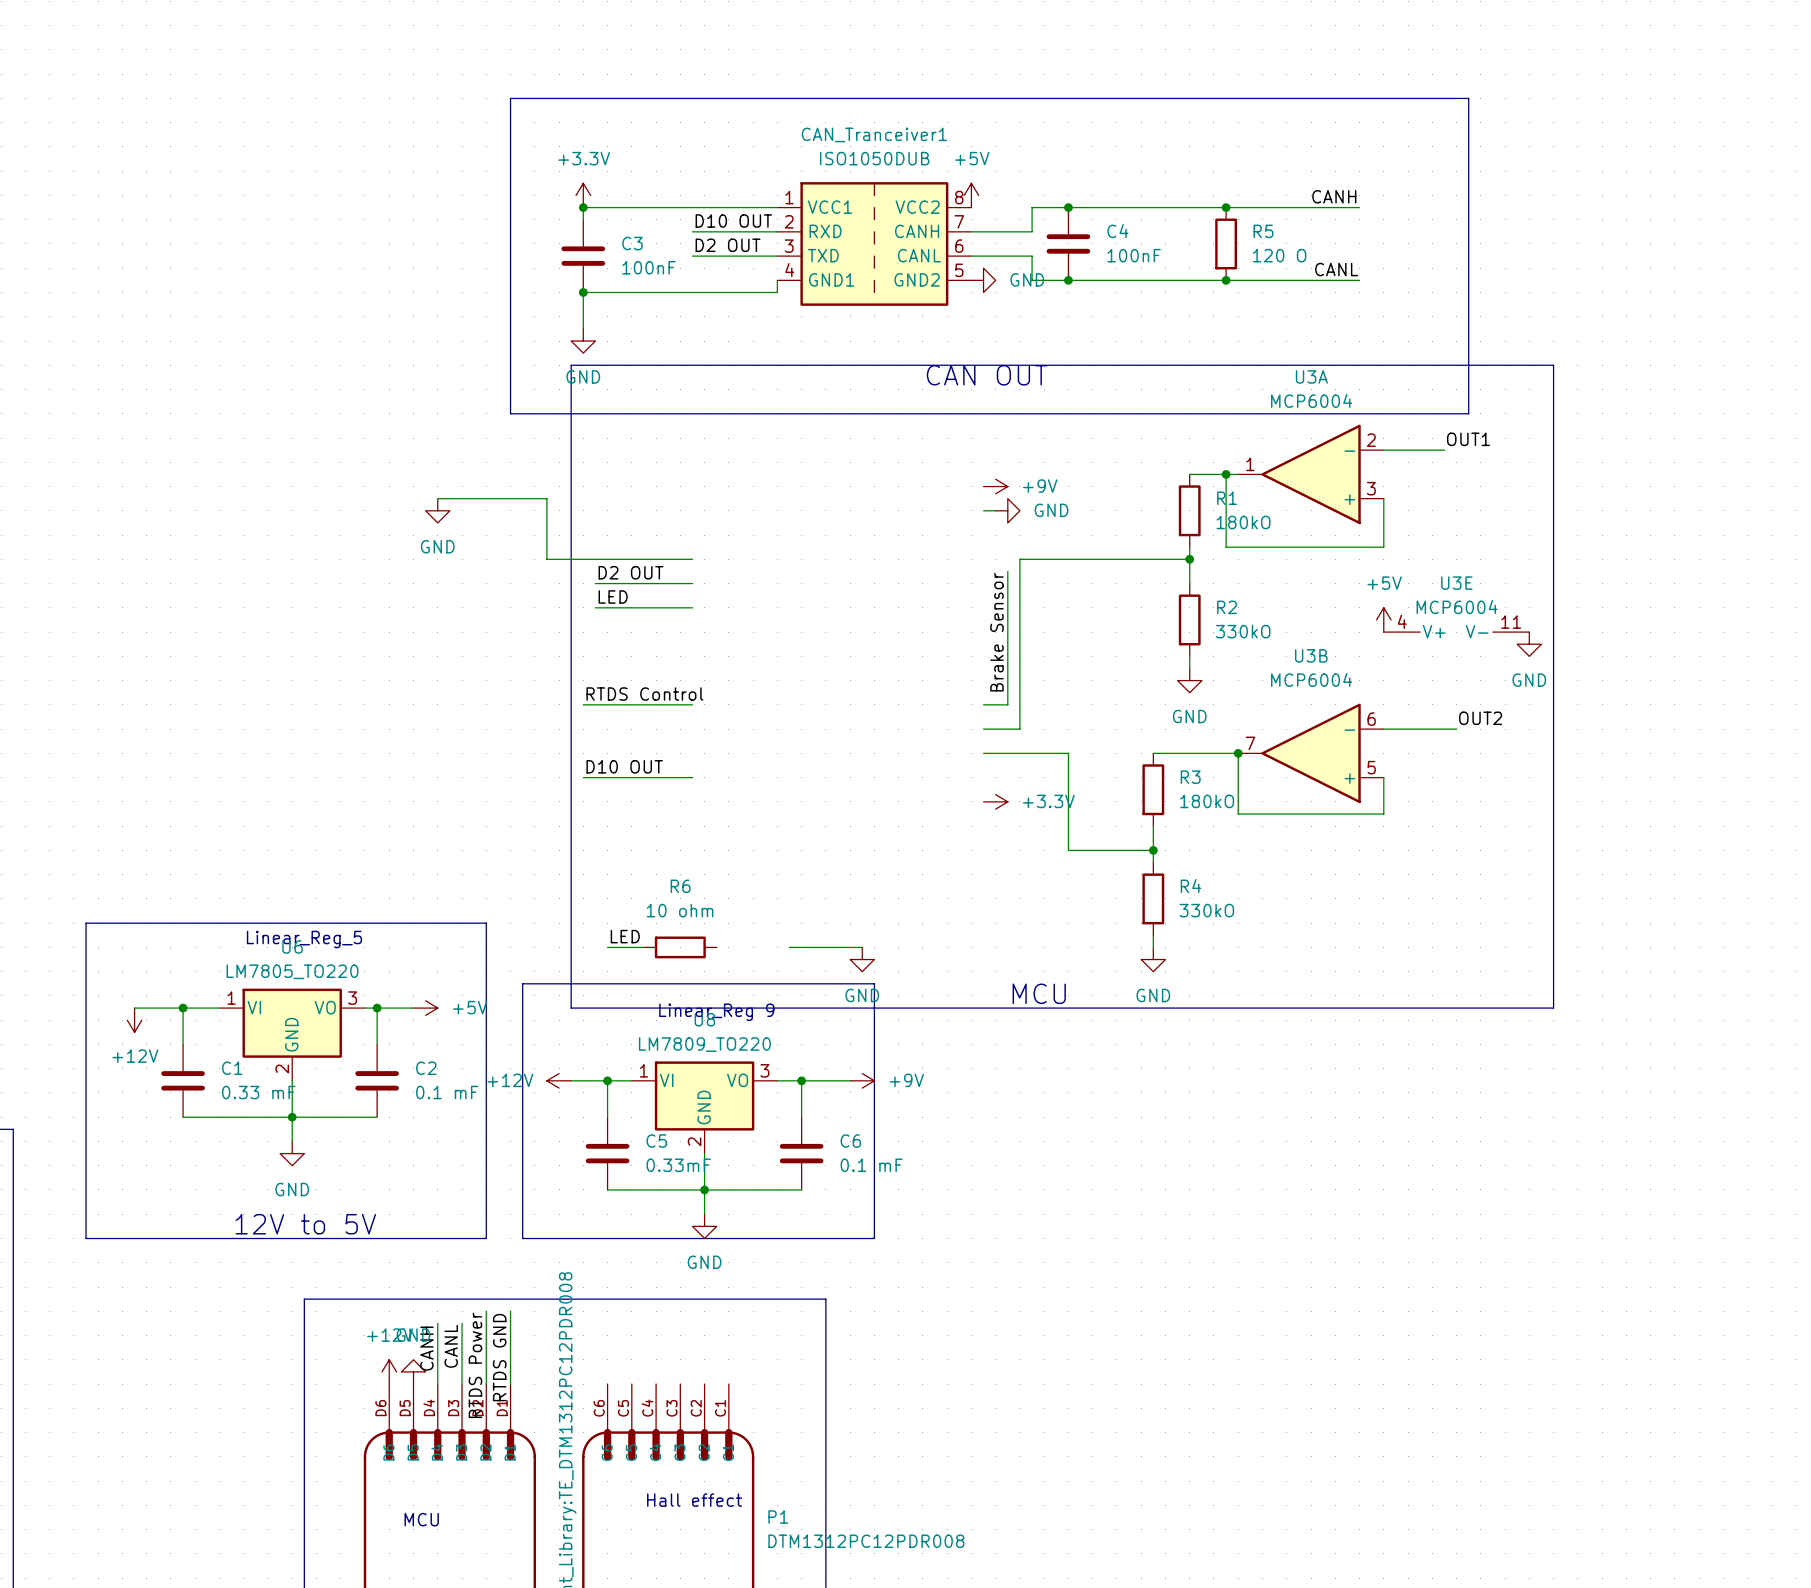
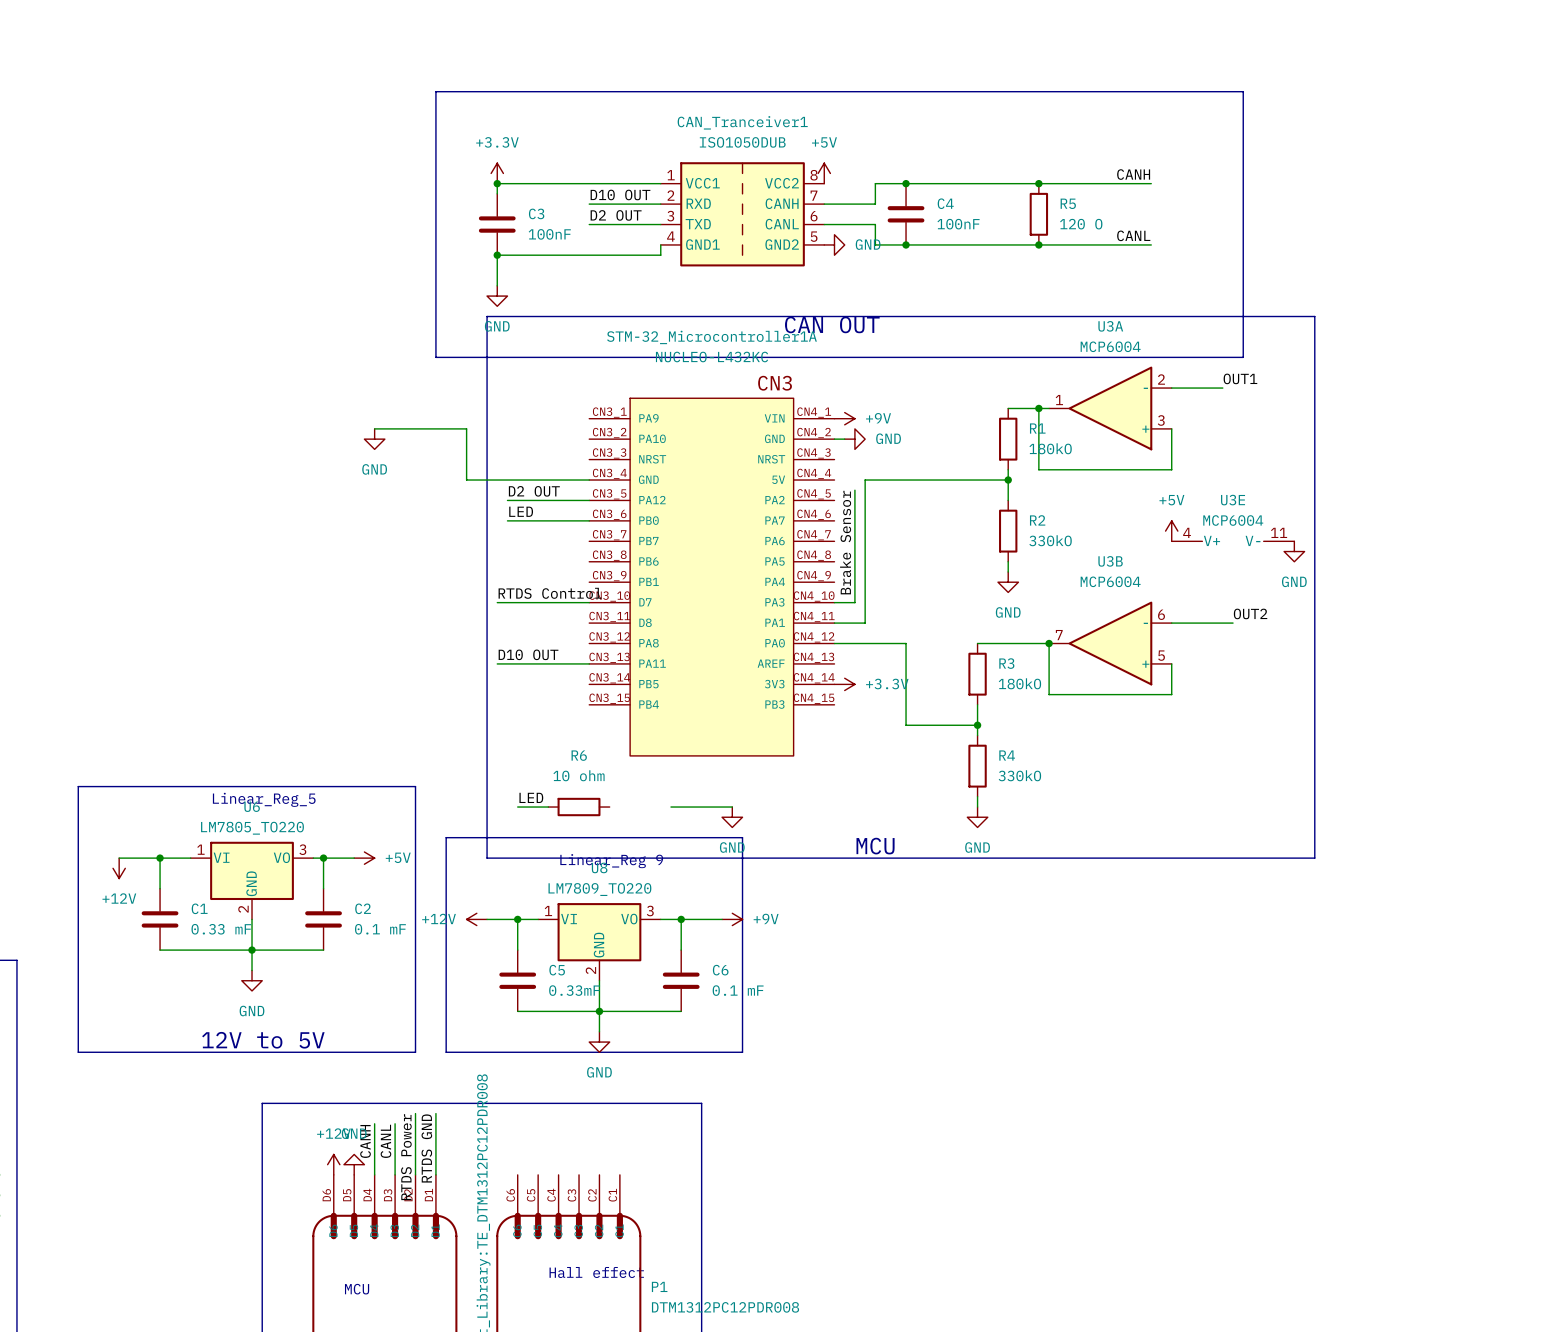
STM-32_Microcontroller1A: none -> NUCLEO-L432KC (711, 577)

